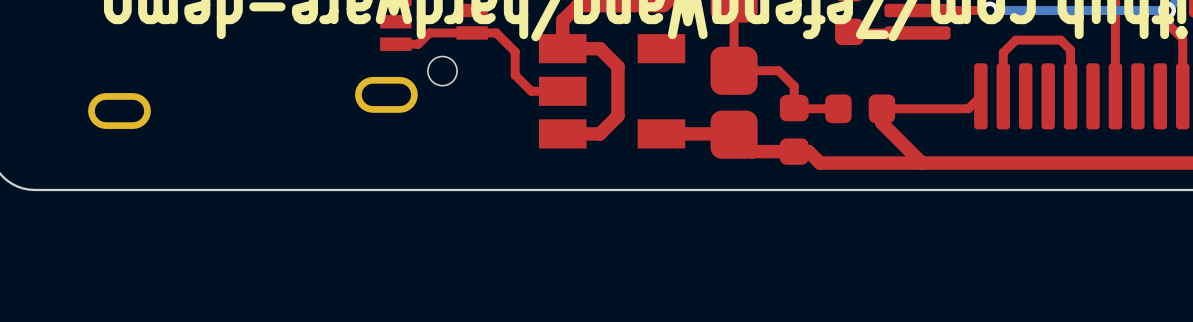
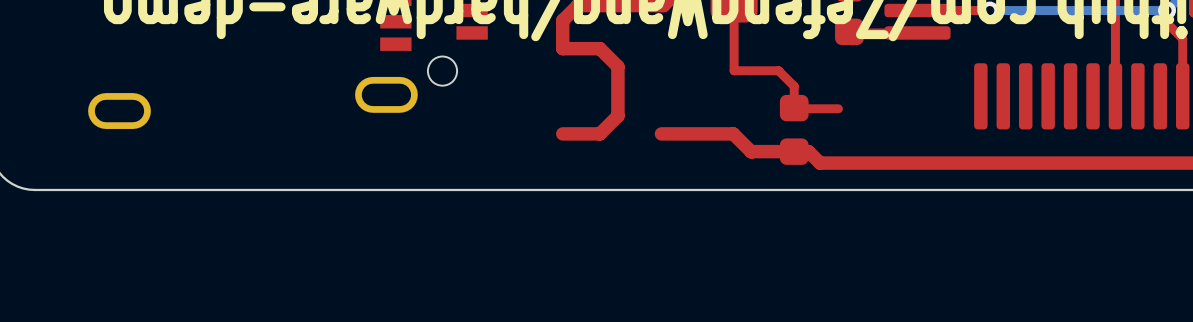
top track: (395, 44) (418, 44) (429, 32) (496, 32) (515, 51) (515, 75) (531, 91) (562, 91) -> none
part: (612, 91) -> none
top track: (980, 96) (968, 108) (881, 108) (881, 123) (921, 163) -> none
top track: (1070, 96) (1070, 50) (1060, 40) (1015, 40) (1003, 52) (1003, 96) -> none
part: (734, 102) -> none
part: (860, 108) -> none

